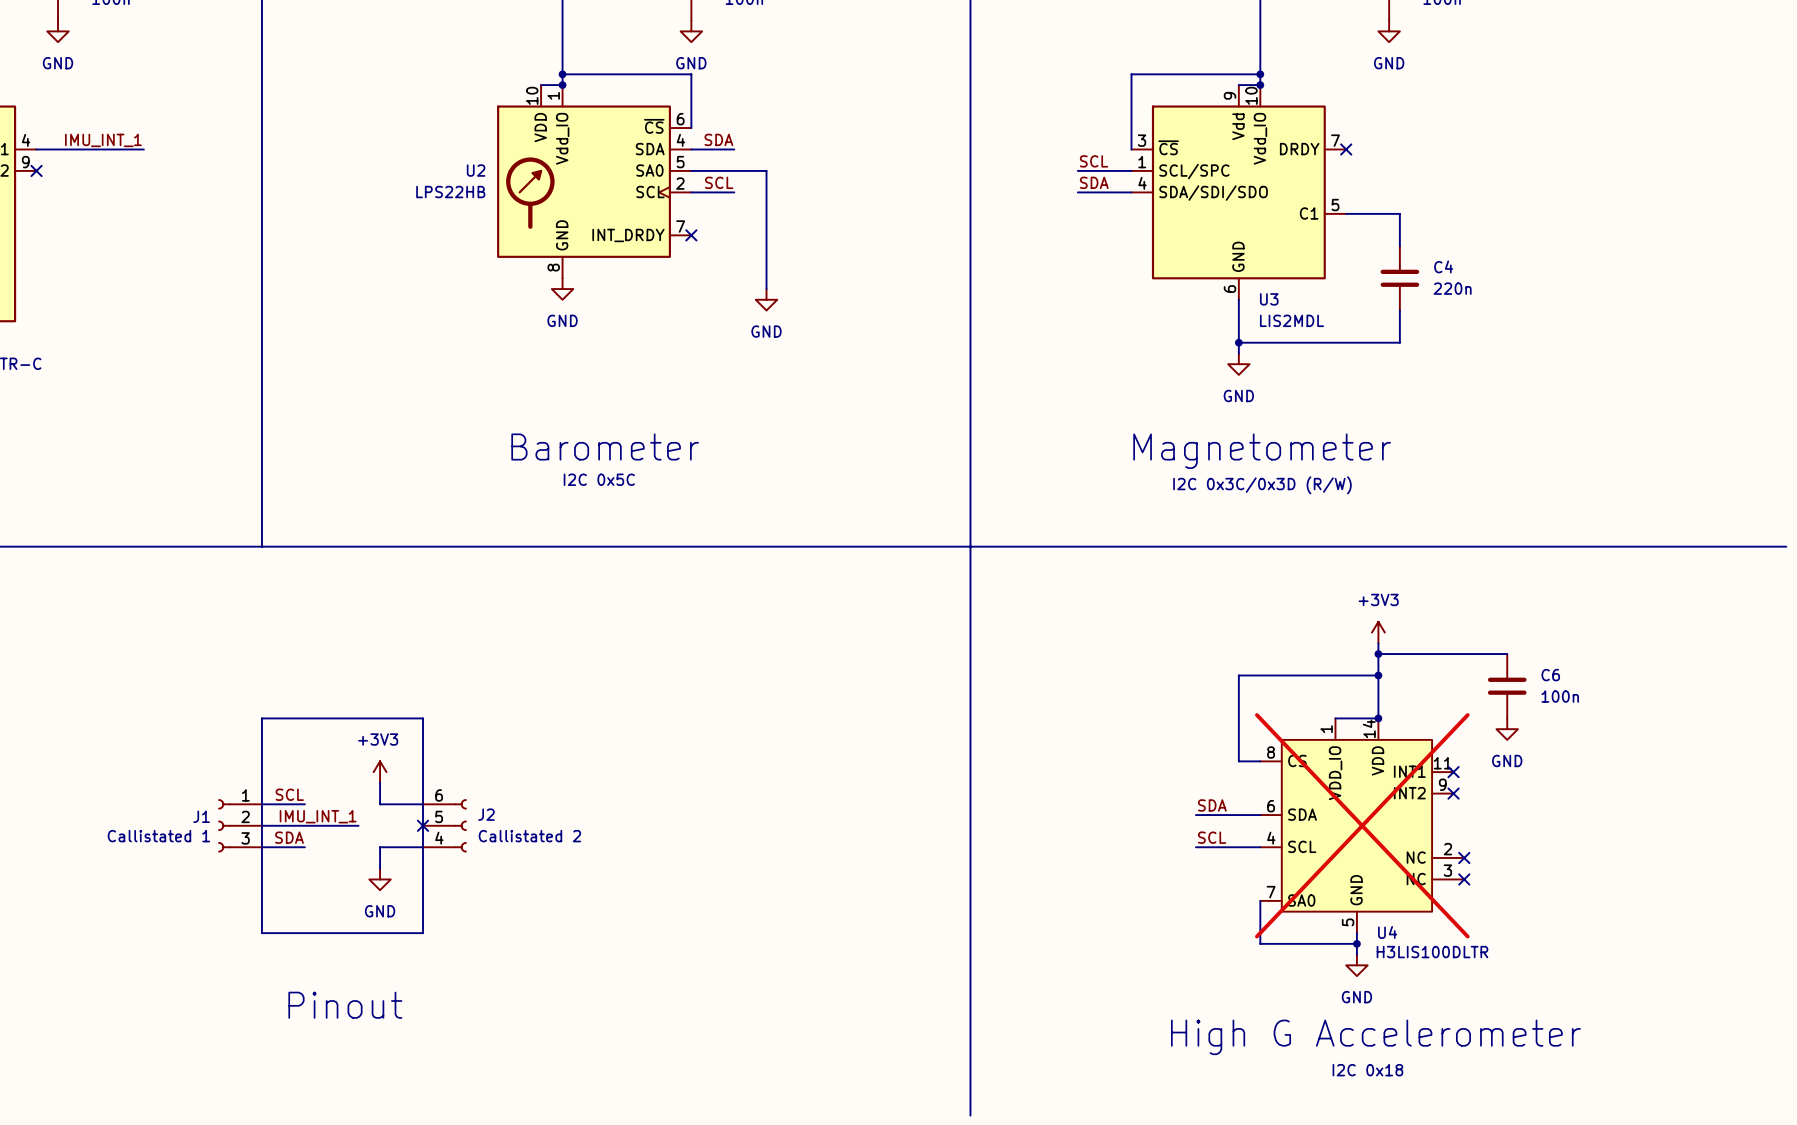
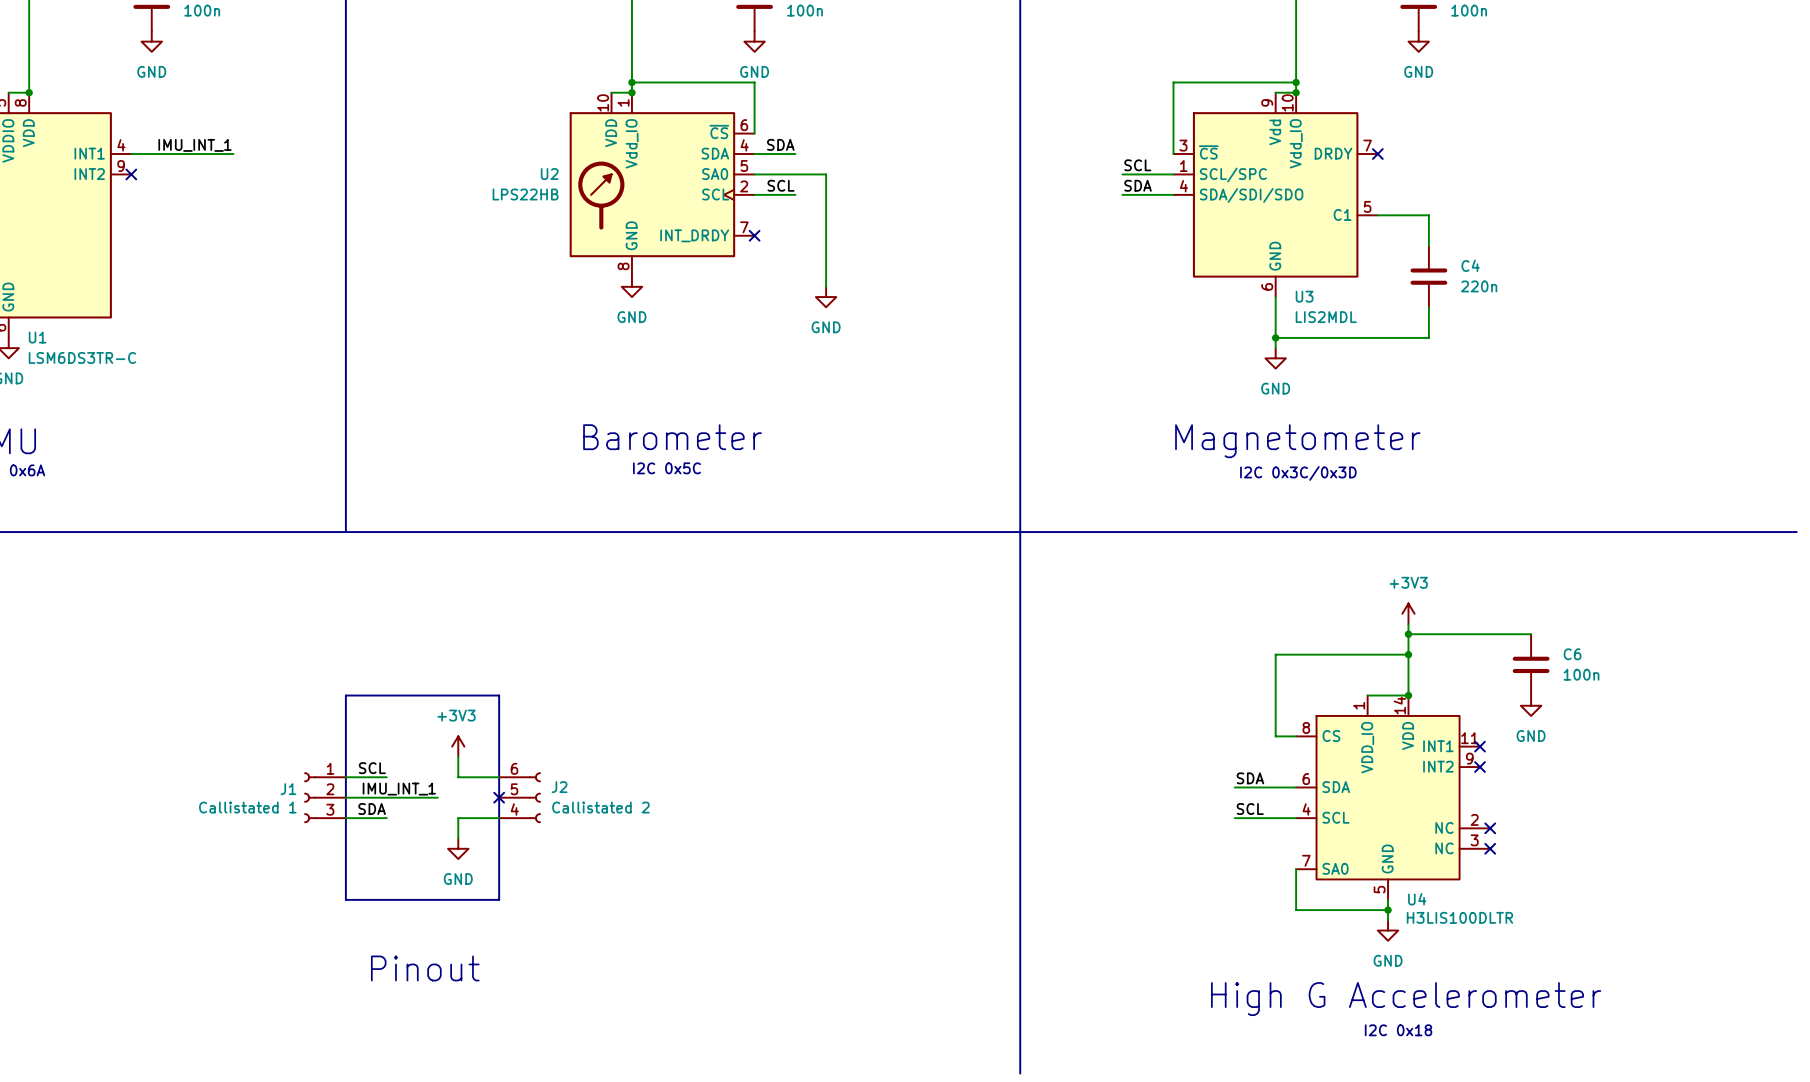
text: I2C 0x3C/0x3D (R/W) (1262, 485) -> I2C 0x3C/0x3D (1298, 473)
U4 do-not-place cross: (1362, 825) -> none

